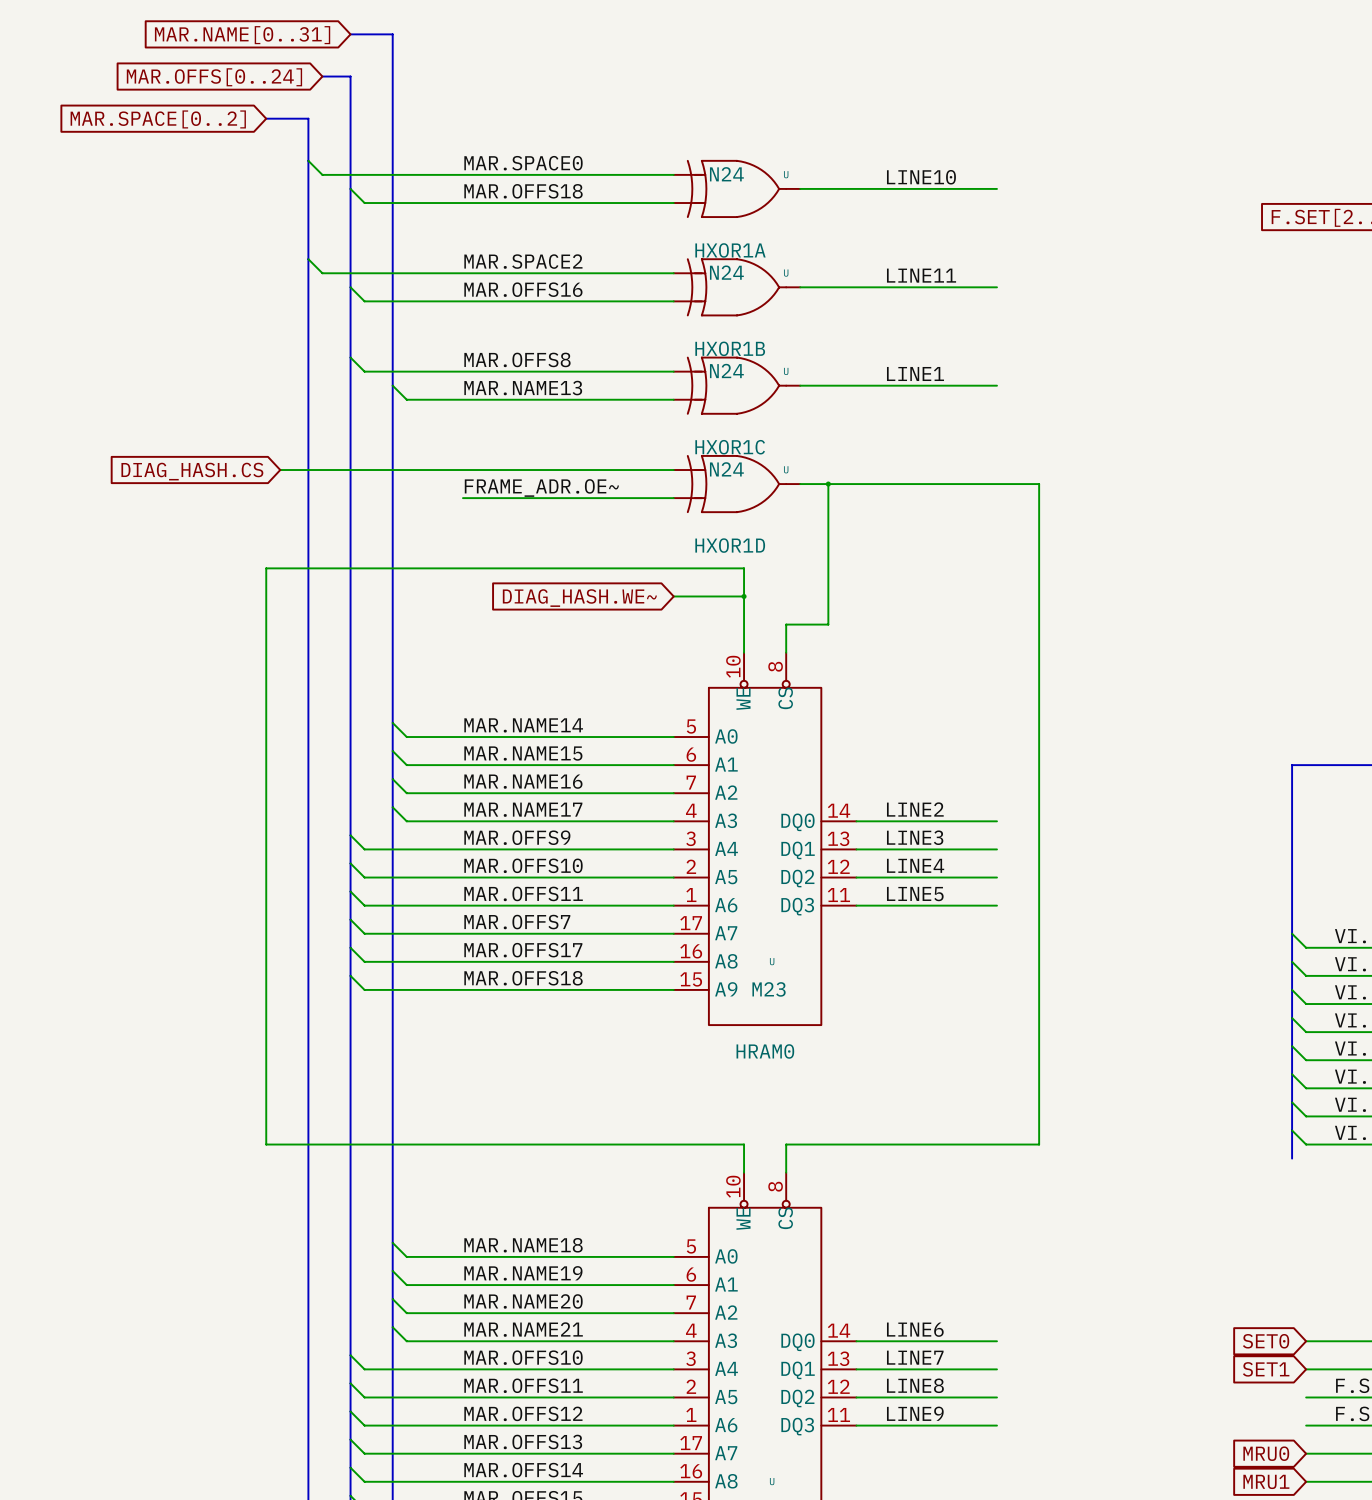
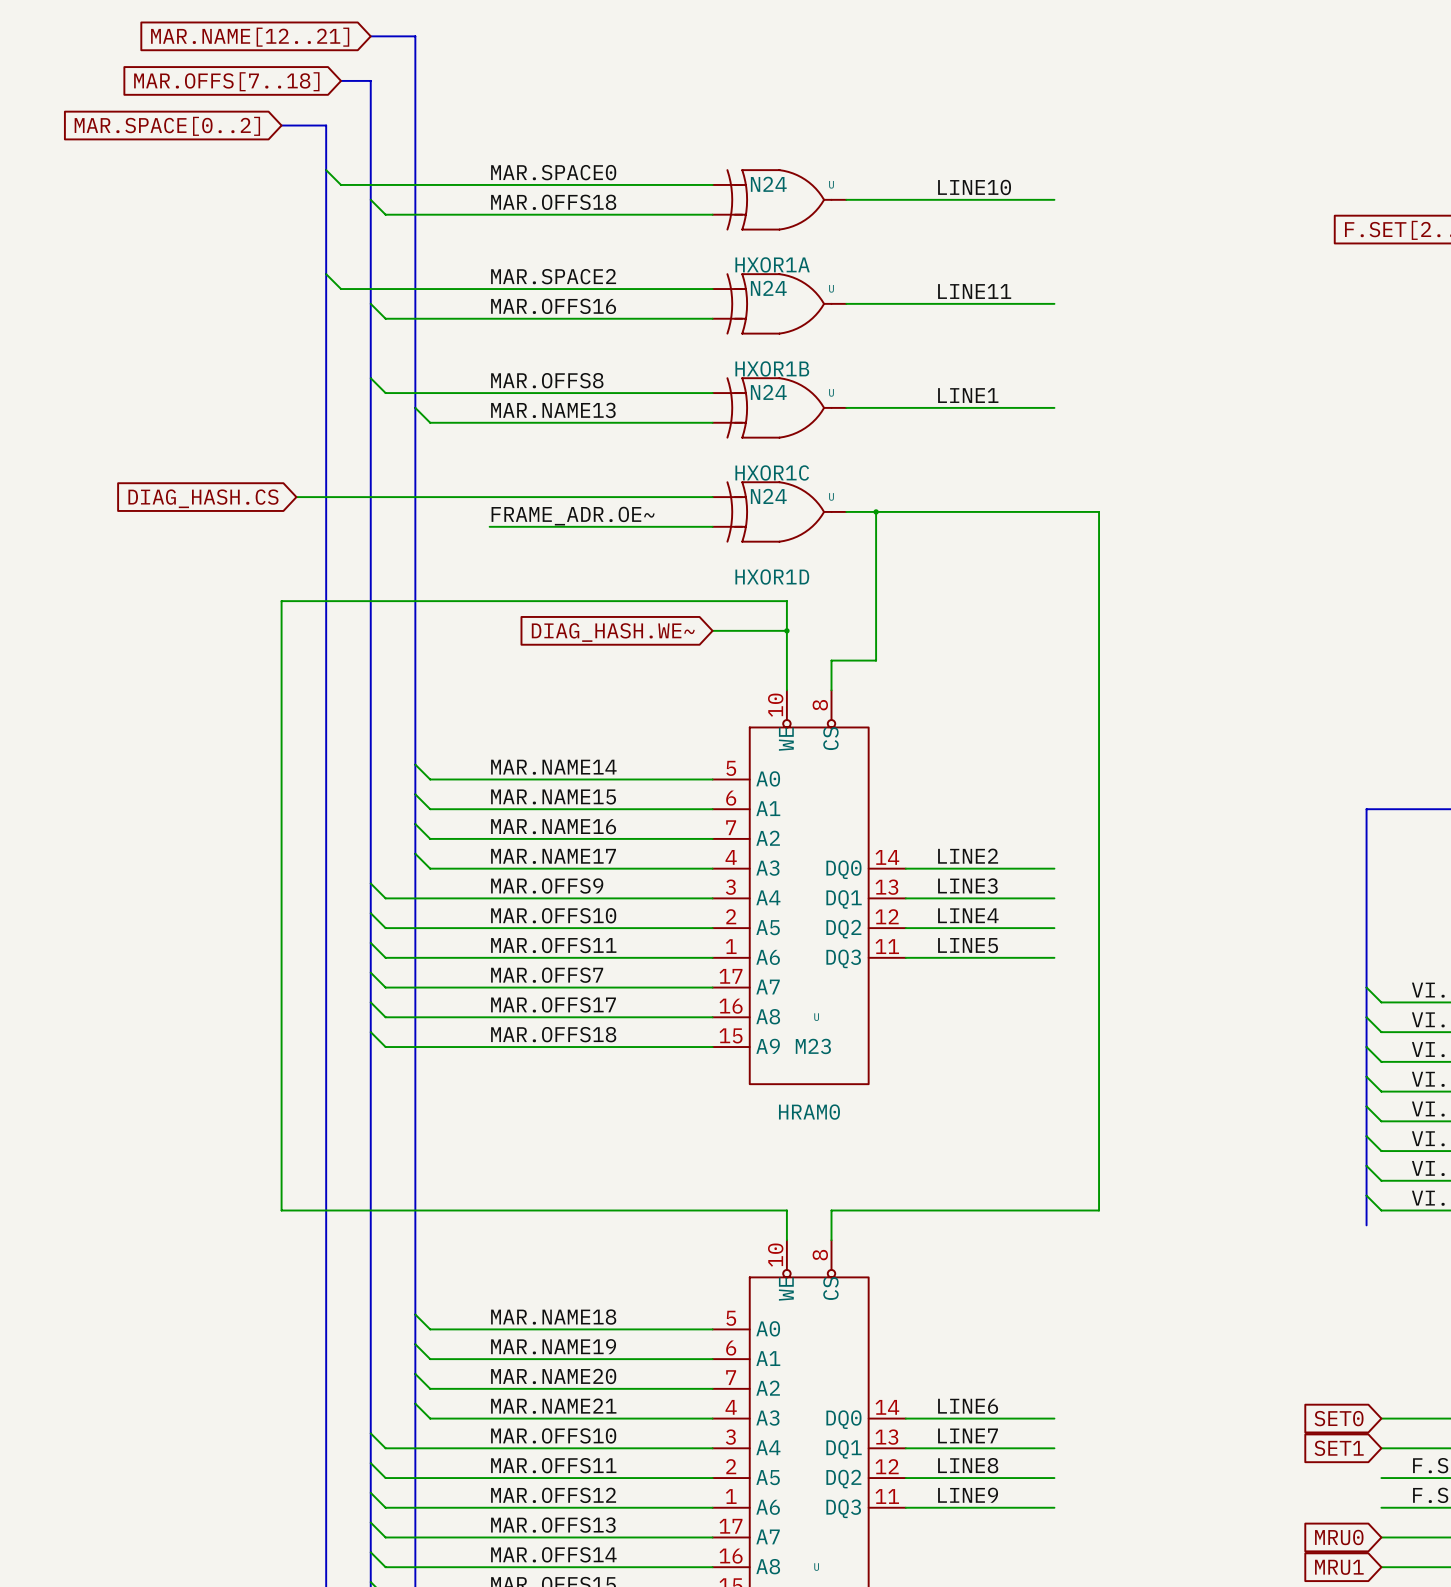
global label: MAR.NAME[0..31] (242, 35) -> MAR.NAME[12..21] (250, 37)
global label: MAR.OFFS[0..24] (214, 77) -> MAR.OFFS[7..18] (226, 81)

